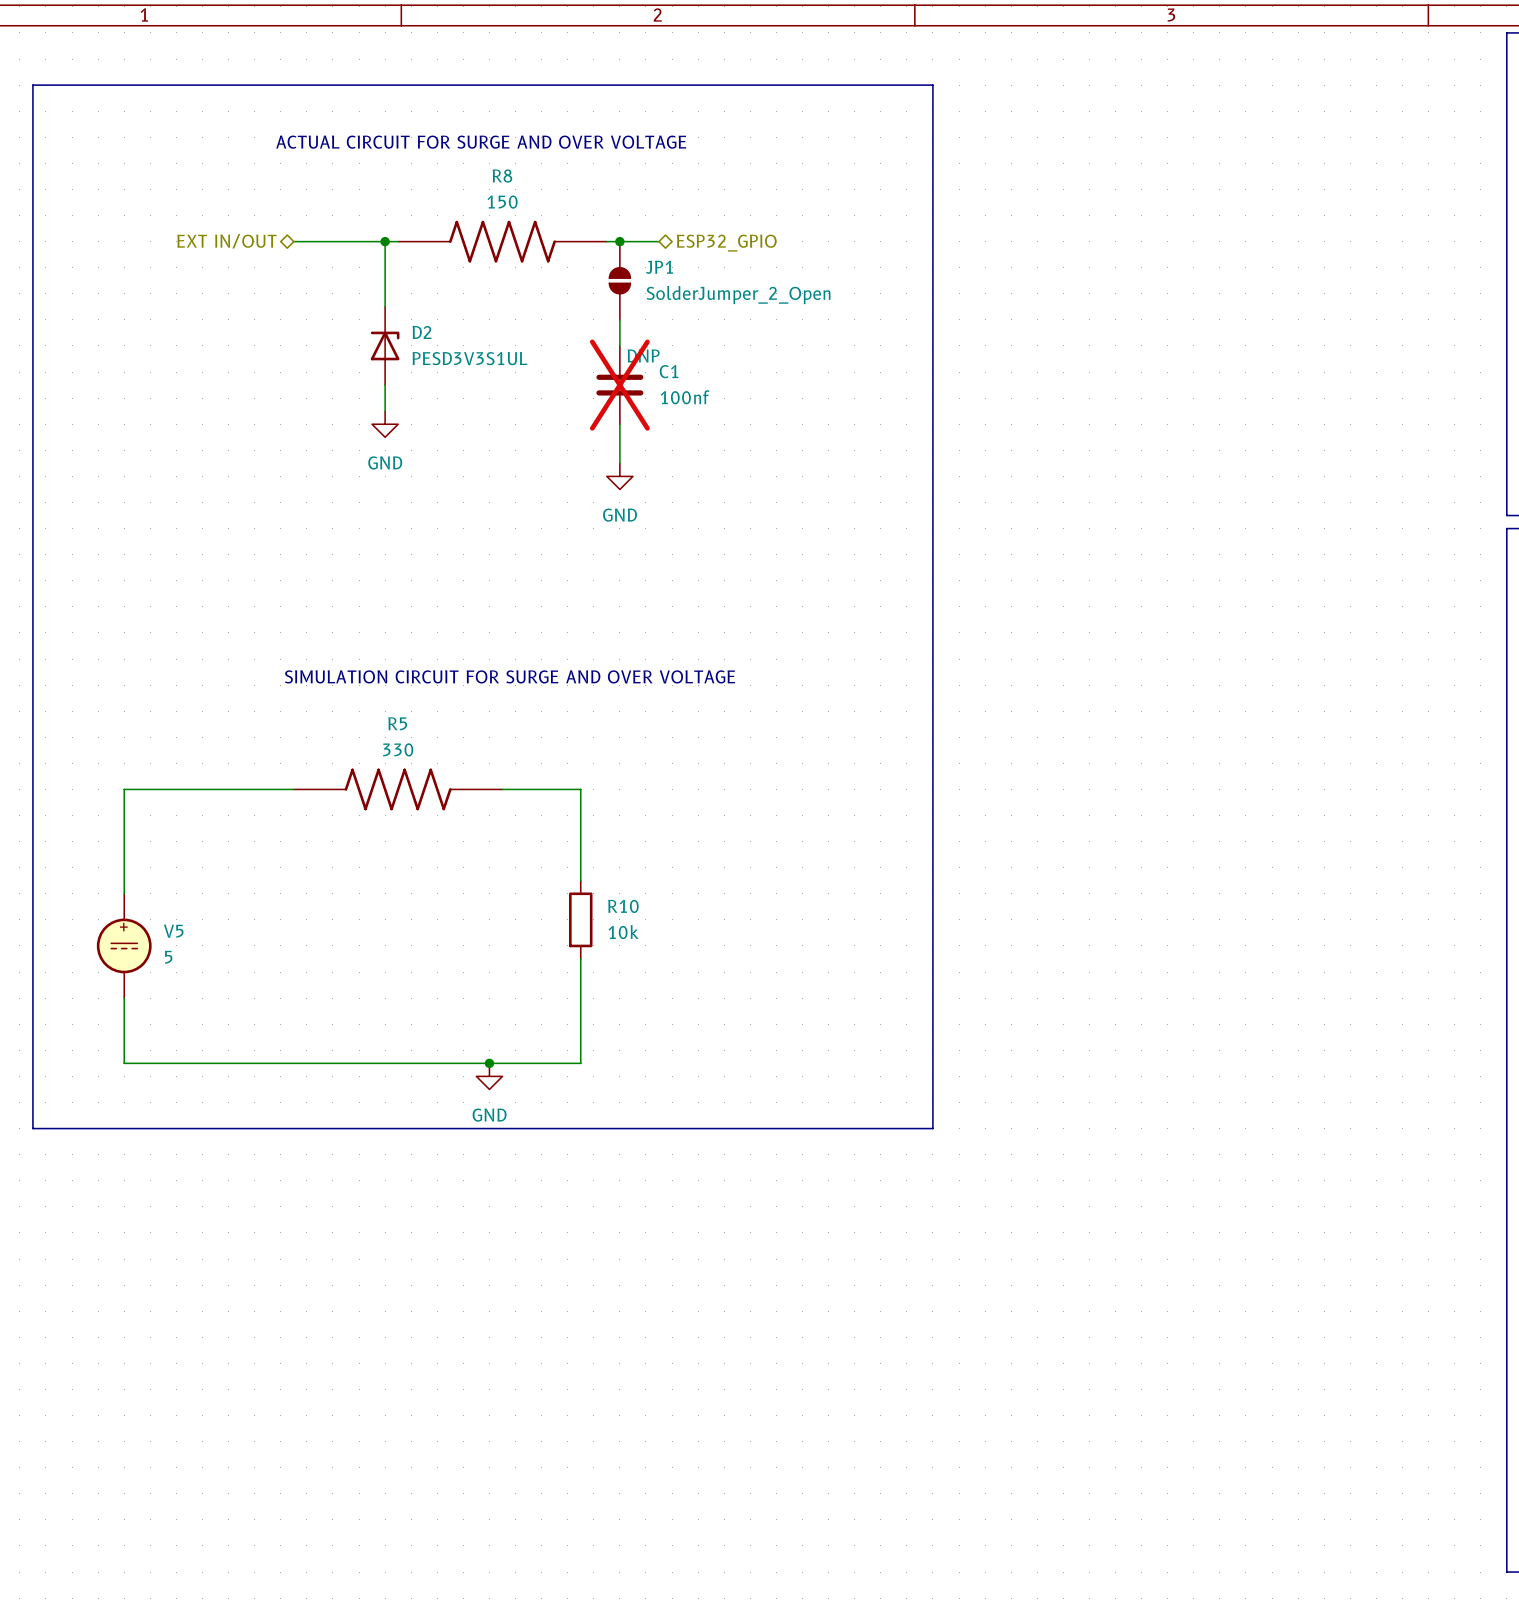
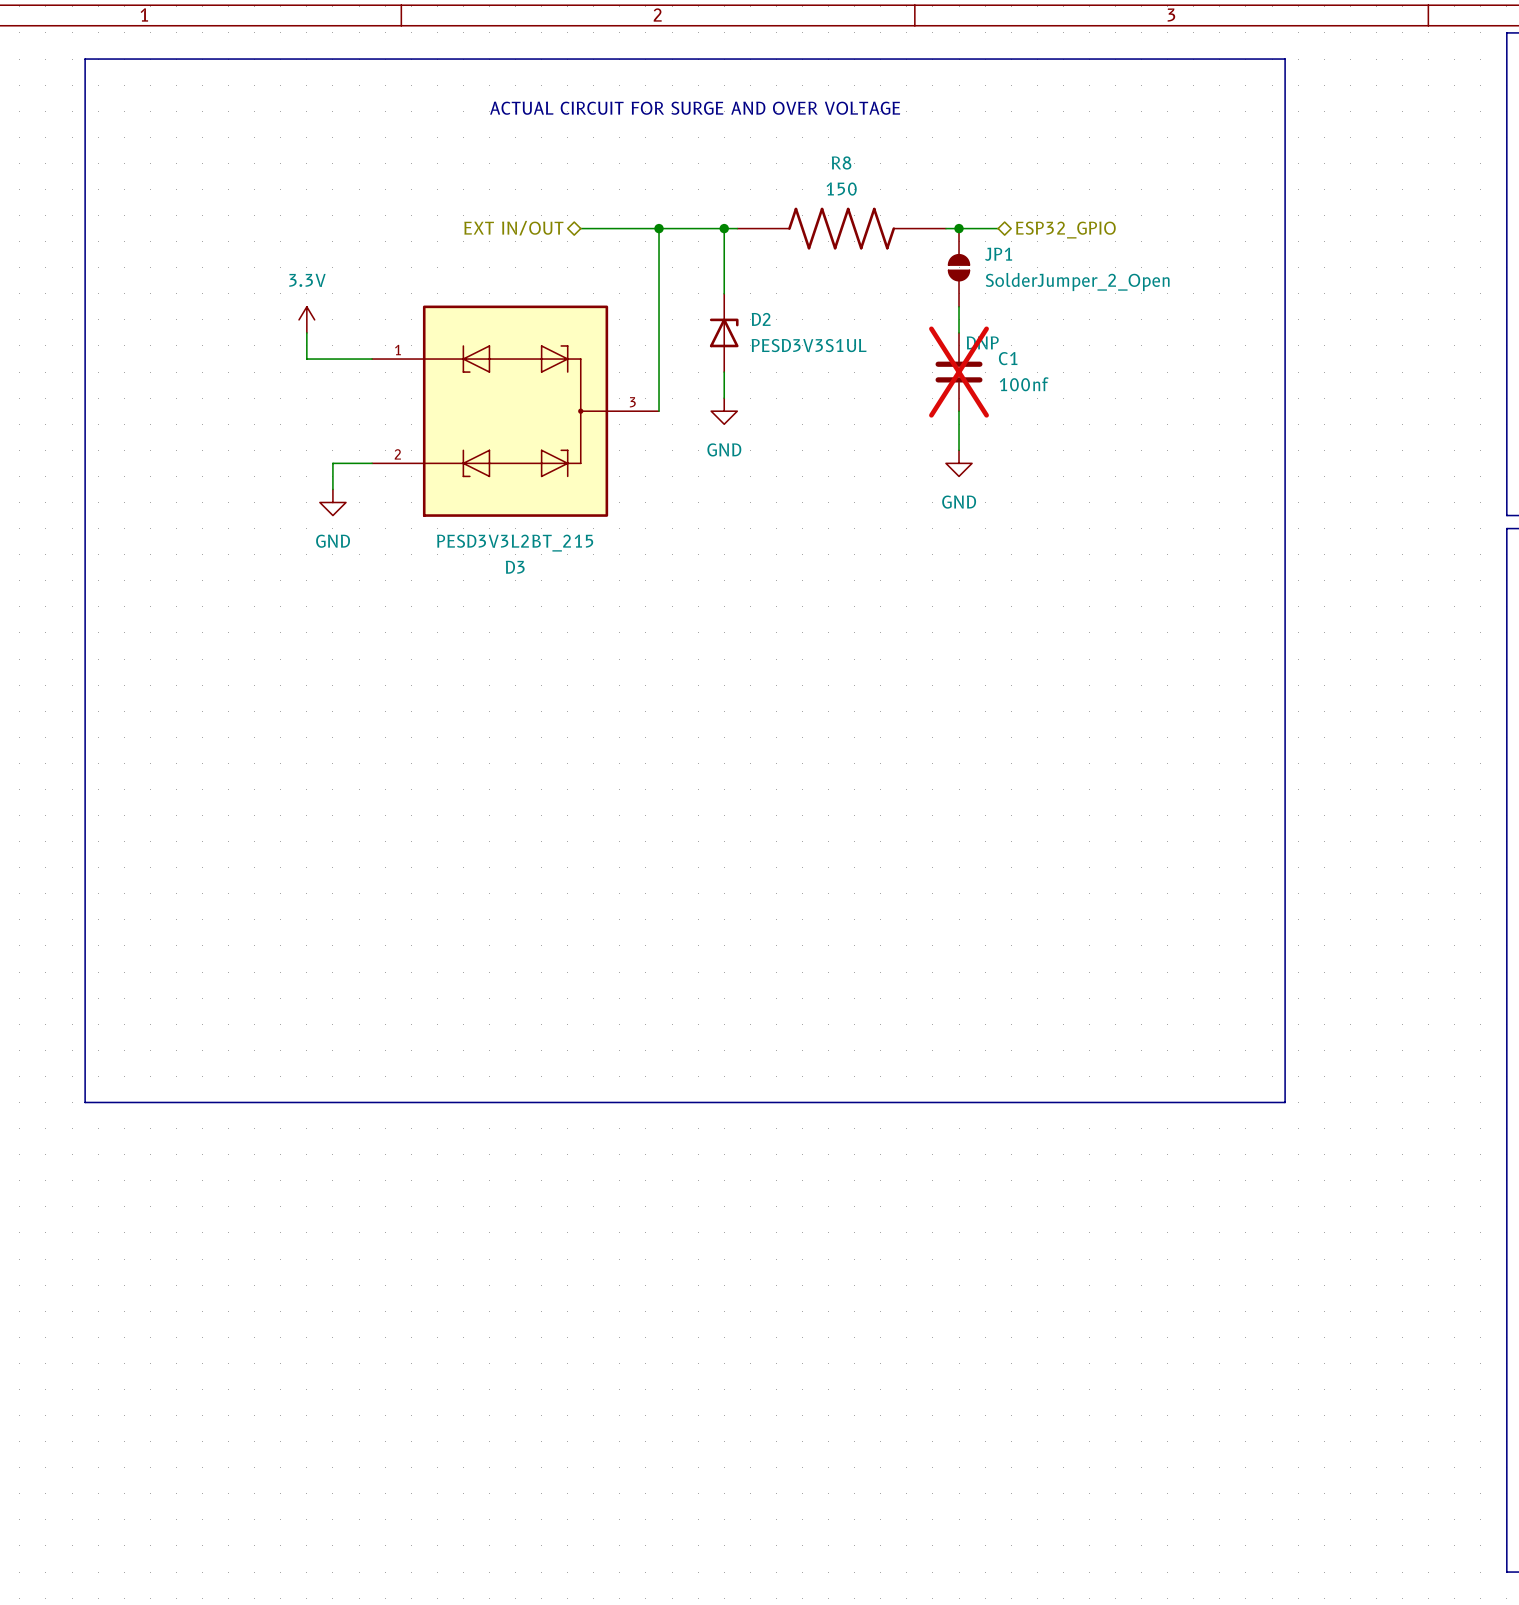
line: (32, 85) (932, 85) (932, 1128) (32, 1128) (32, 85) -> (85, 59) (85, 1102) (1285, 1102) (1285, 59) (85, 59)
text position: ACTUAL CIRCUIT FOR SURGE AND OVER VOLTAGE (481, 142) -> ACTUAL CIRCUIT FOR SURGE AND OVER VOLTAGE (695, 108)
hierarchical label: none -> EXT IN/OUT (513, 228)
wire: none -> (580, 228) (737, 228)
wire: none -> (659, 228) (659, 411)
wire: none -> (724, 228) (724, 293)
junction: none -> (724, 228)
wire: none -> (945, 228) (998, 228)
junction: none -> (959, 228)
hierarchical label: none -> ESP32_GPIO (1065, 230)
hierarchical label: EXT IN/OUT (226, 241) -> none
wire: (293, 241) (398, 241) -> none
wire: (385, 241) (385, 306) -> none
junction: (385, 241) -> none
R8 position: (502, 241) -> (841, 228)
wire: (606, 241) (659, 241) -> none
junction position: (619, 241) -> (659, 228)
hierarchical label: ESP32_GPIO (726, 243) -> none
JP1 position: (619, 280) -> (959, 267)
wire: none -> (959, 306) (959, 332)
power symbol: none -> 3.3V (306, 319)
wire: (619, 319) (619, 345) -> (724, 372) (724, 398)
wire: none -> (306, 332) (306, 359) (372, 359)
D2 position: (385, 345) -> (724, 332)
wire: (385, 385) (385, 411) -> none
C1 position: (619, 385) -> (959, 372)
D3: none -> PESD3V3L2BT_215 (515, 411)
wire: none -> (959, 411) (959, 450)
power symbol position: GND (385, 424) -> GND (332, 502)
wire: (619, 424) (619, 463) -> none
wire: none -> (372, 463) (332, 463) (332, 489)
power symbol: none -> GND (959, 463)
power symbol position: GND (619, 476) -> GND (724, 411)
text: SIMULATION CIRCUIT FOR SURGE AND OVER VOLTAGE (510, 676) -> none
wire: (293, 789) (124, 789) (124, 893) -> none
R5: 330 (398, 789) -> none
wire: (502, 789) (580, 789) (580, 880) -> none
R10: 10k (580, 919) -> none
V5: 5 (124, 945) -> none
wire: (580, 959) (580, 1063) (124, 1063) (124, 998) -> none
junction: (489, 1063) -> none
power symbol: GND (489, 1076) -> none

